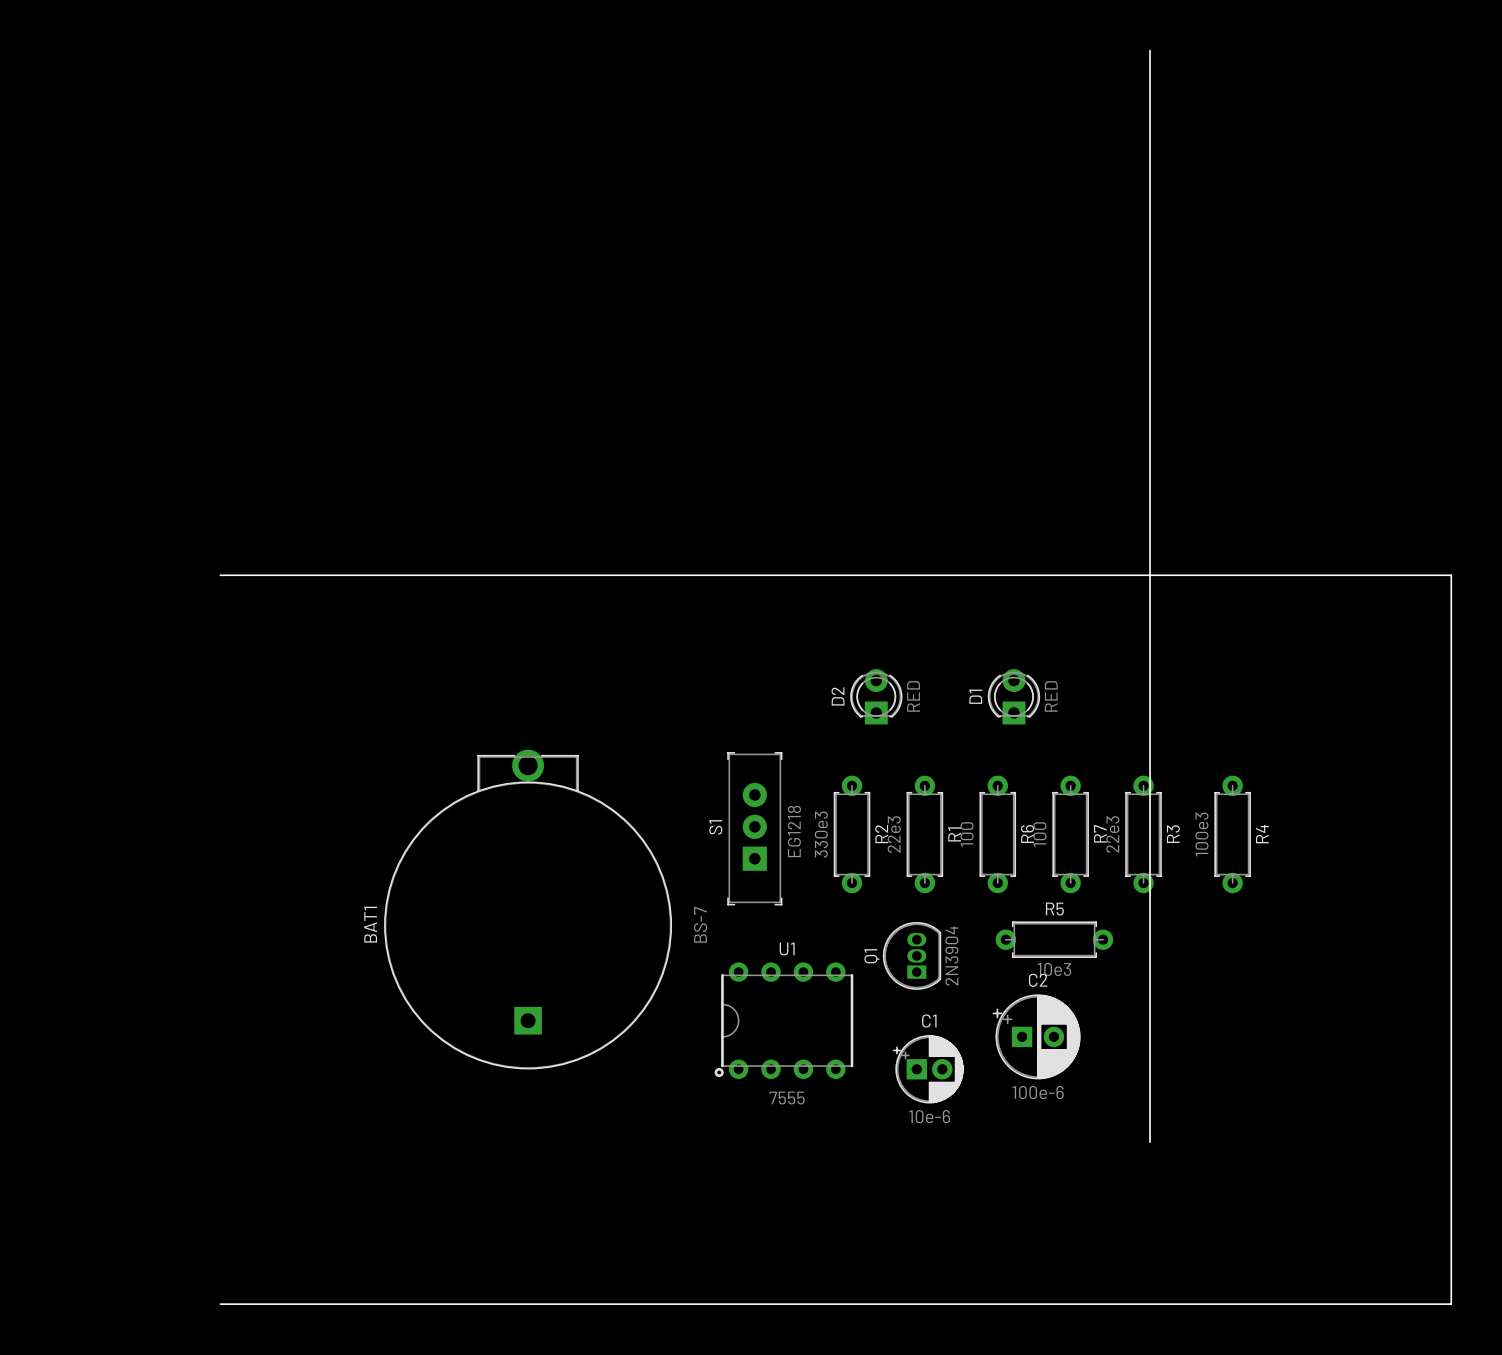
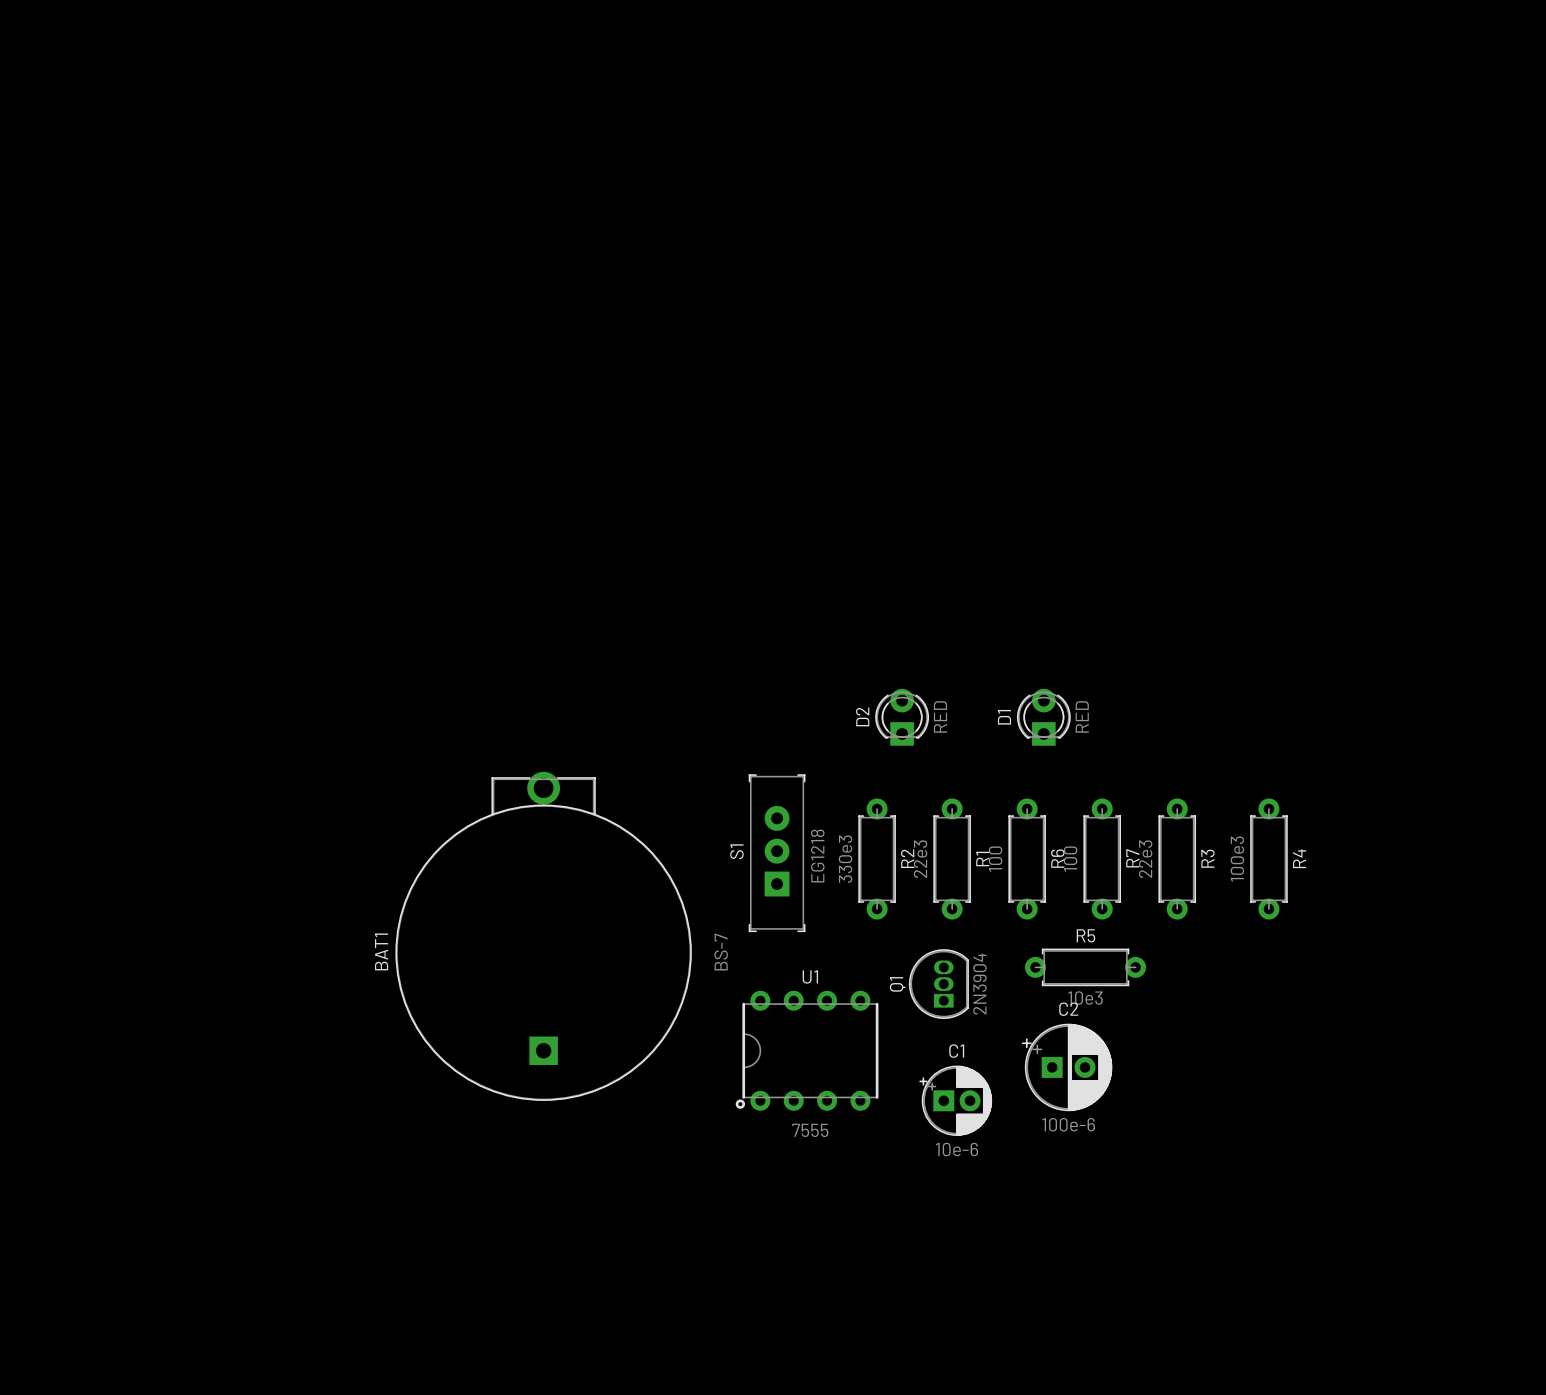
board edge: (1150, 50) (1150, 1142) -> none
board edge: (220, 575) (1451, 575) (1451, 1304) (220, 1304) -> none

